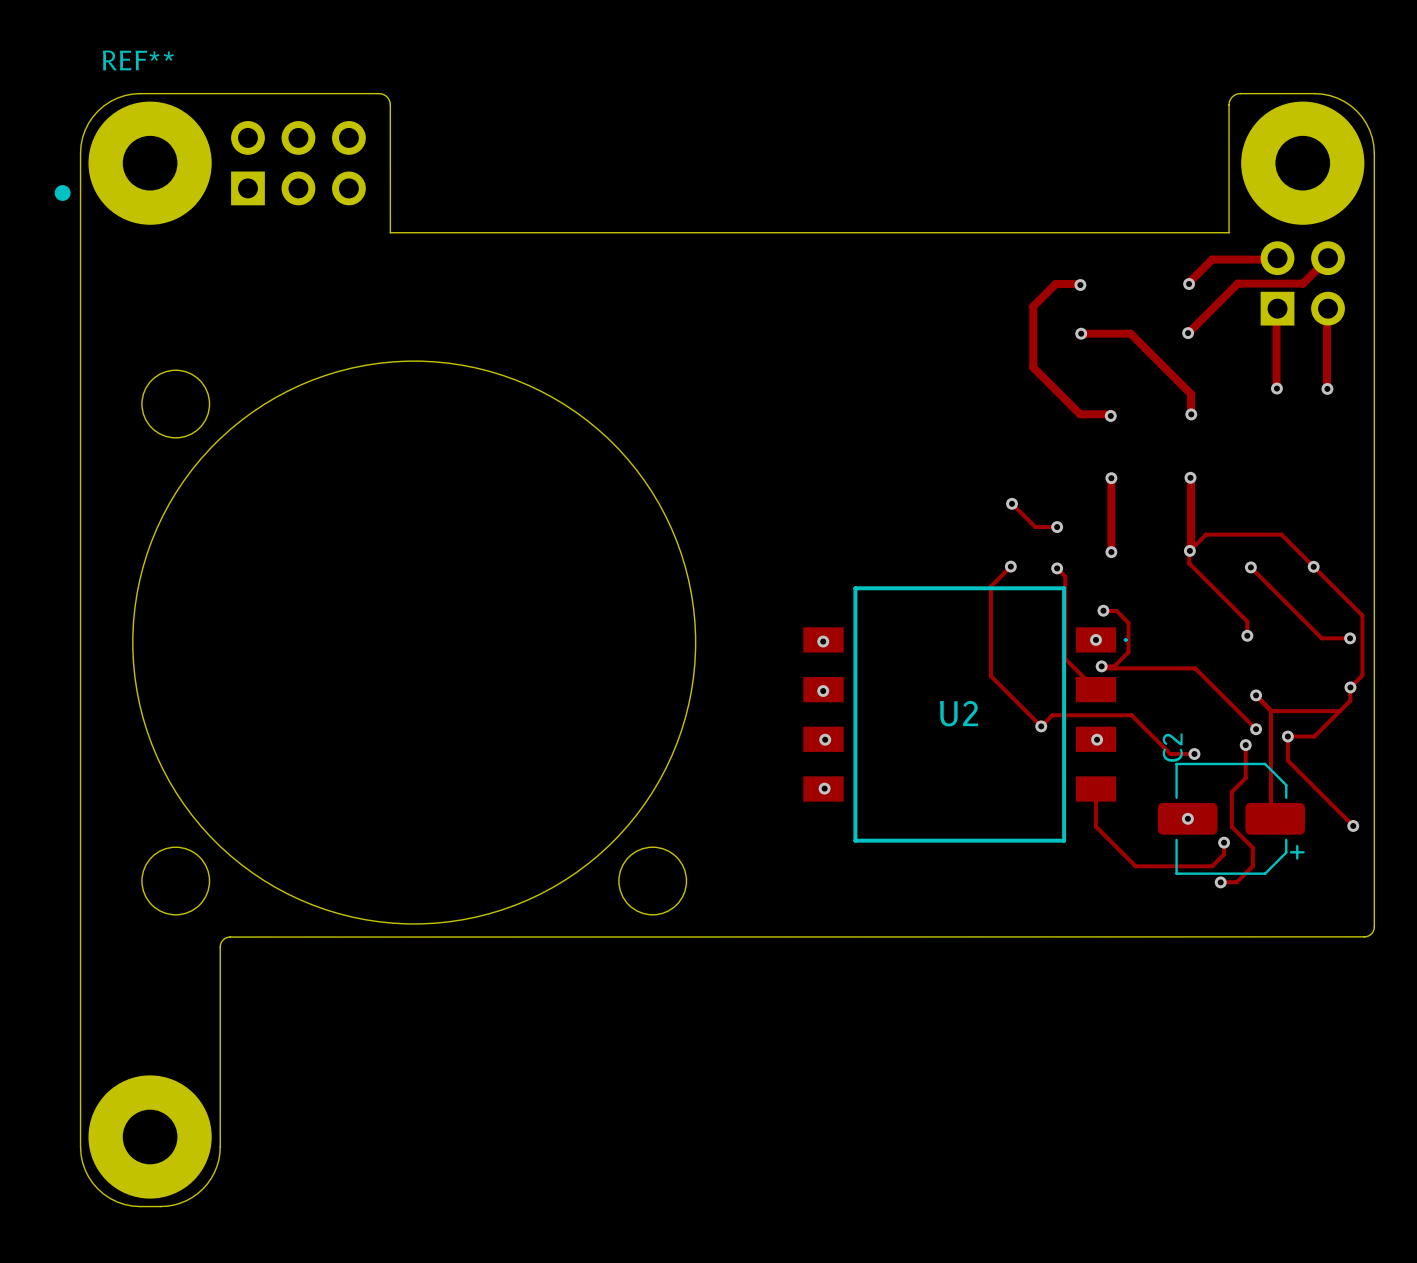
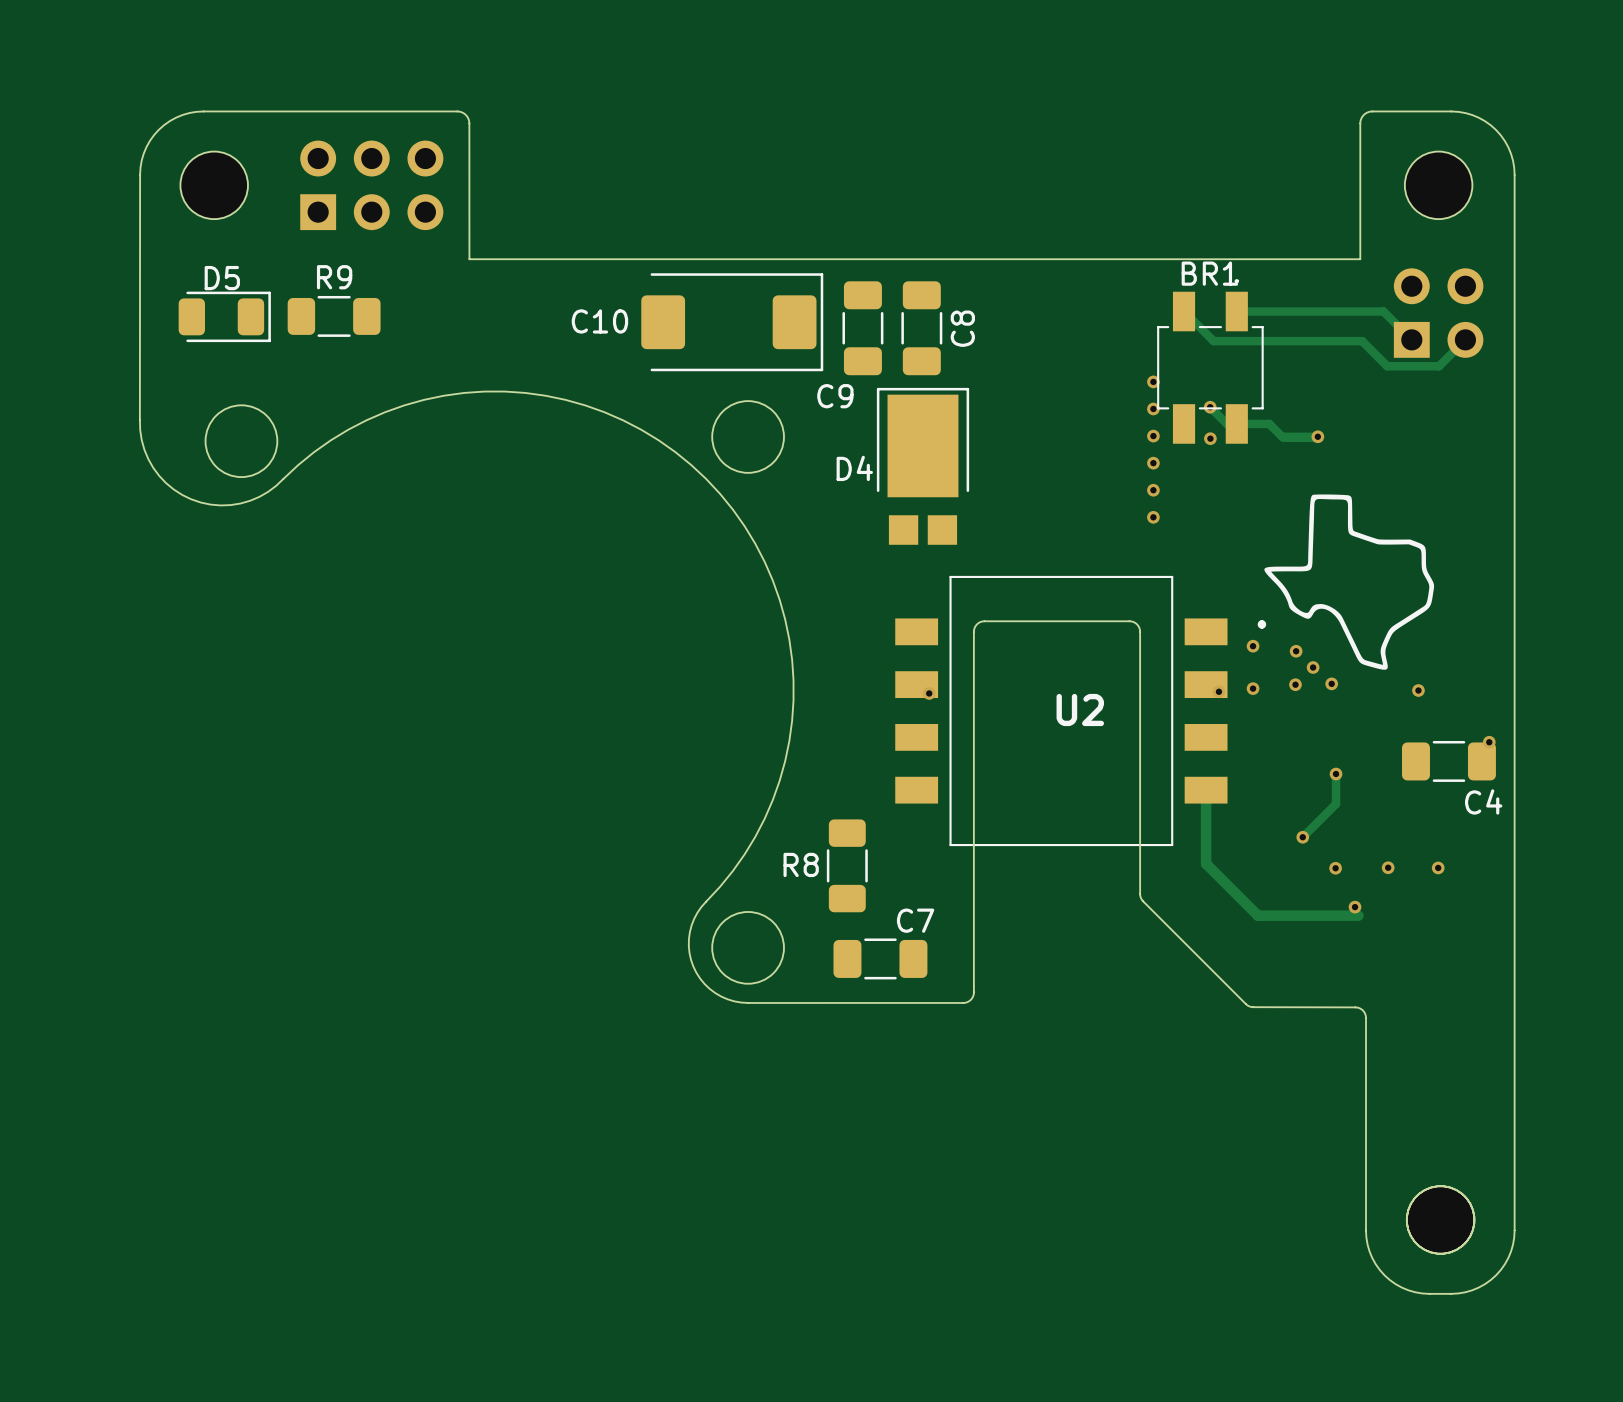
board edge: none -> (203, 111) (182, 114) (164, 125) (149, 141) (141, 160) (139, 420)
part: none -> (214, 185)
part: none -> (1438, 185)
track: (1276, 259) (1212, 259) (1189, 282) -> none
track: (1327, 259) (1302, 283) (1237, 283) (1188, 333) -> none
track: none -> (1184, 311) (1213, 341) (1362, 341) (1387, 366) (1439, 366) (1465, 339)
track: none -> (1236, 311) (1383, 311) (1411, 339)
track: (1079, 284) (1055, 284) (1033, 306) (1033, 367) (1080, 414) (1111, 414) -> none
via: (1189, 284) -> none
via: (1080, 285) -> none
D5: none -> (224, 316)
R9: none -> (334, 316)
C10: none -> (732, 322)
C9: none -> (862, 328)
C8: none -> (921, 328)
track: (1276, 310) (1276, 387) -> none
track: (1327, 310) (1327, 388) -> none
BR1: none -> (1210, 361)
track: (1081, 333) (1130, 333) (1191, 394) (1191, 413) -> none
via: (1081, 333) -> none
via: (1188, 333) -> none
via: none -> (1153, 381)
round board edge: [132, 360, 697, 925] -> none
round board edge: none -> [711, 400, 785, 474]
track: none -> (1210, 407) (1226, 423) (1269, 423) (1282, 436) (1317, 436) (1283, 437)
via: none -> (1210, 407)
via: none -> (1153, 408)
via: (1276, 388) -> none
via: (1327, 388) -> none
via: none -> (1153, 436)
via: none -> (1210, 438)
via position: (1191, 414) -> (1317, 436)
via: (1110, 415) -> none
via: none -> (1153, 463)
D4: none -> (922, 466)
via: none -> (1153, 490)
drawing: none -> [1264, 494, 1435, 670]
via: none -> (1153, 517)
via: (1190, 477) -> none
track: (1111, 478) (1111, 549) -> none
via: (1111, 478) -> none
track: (1191, 478) (1191, 549) -> none
track: (1012, 503) (1035, 527) (1057, 527) -> none
via: (1012, 503) -> none
via: (1057, 527) -> none
track: (1205, 534) (1281, 534) (1362, 615) (1362, 675) (1350, 687) -> none
track: (1205, 534) (1189, 550) -> none
track: (1189, 550) (1189, 563) (1247, 621) (1247, 635) -> none
via: (1189, 550) -> none
via: (1111, 552) -> none
track: (1010, 566) (990, 586) (990, 676) (1041, 726) (1052, 715) (1131, 715) (1170, 754) (1194, 754) -> none
via: (1010, 566) -> none
via: (1313, 566) -> none
track: (1250, 567) (1321, 638) (1350, 638) -> none
via: (1250, 567) -> none
track: (1057, 568) (1065, 576) (1065, 658) (1095, 689) -> none
via: (1057, 568) -> none
U2 footprint: [803, 586, 1128, 843] -> [895, 575, 1267, 847]
via: none -> (1253, 646)
via: none -> (1296, 651)
track: (1103, 610) (1116, 610) (1128, 622) (1128, 652) (1114, 666) (1101, 666) -> none
via: (1103, 610) -> none
via: none -> (1313, 667)
via: none -> (1331, 683)
via: none -> (1295, 684)
via: (1247, 635) -> none
via: none -> (1253, 688)
via: none -> (1418, 690)
via: (1350, 638) -> none
REF**: (714, 650) -> none
track: (1101, 666) (1103, 668) (1195, 668) (1256, 729) -> none
via: (1101, 666) -> none
track: (1350, 687) (1350, 700) (1314, 736) (1287, 736) (1287, 760) (1353, 825) -> none
via: (823, 691) -> none
track: (1256, 695) (1270, 710) (1270, 813) -> none
via: (1256, 695) -> none
track: (1257, 697) (1270, 711) (1339, 711) -> none
C4: none -> (1448, 761)
track: none -> (1336, 774) (1336, 803) (1302, 837)
via: none -> (1336, 774)
via: (1041, 726) -> none
via: (1256, 729) -> none
track: none -> (1206, 790) (1206, 863) (1258, 915) (1358, 915)
via: (1287, 736) -> none
via: (825, 739) -> none
via: (1097, 739) -> none
track: (1245, 745) (1245, 778) (1231, 791) (1231, 826) (1252, 847) (1252, 866) (1236, 882) (1220, 882) -> none
via: (1245, 745) -> none
via: (1194, 754) -> none
via: none -> (1302, 837)
via: (824, 788) -> none
track: (1095, 789) (1095, 826) (1135, 866) (1212, 866) (1224, 854) (1224, 842) -> none
R8: none -> (847, 865)
via: none -> (1388, 867)
via: none -> (1438, 867)
via: none -> (1335, 868)
via: (1187, 818) -> none
C2: (1231, 818) -> none
via: (1353, 825) -> none
round board edge: [141, 846, 211, 916] -> none
via: (1220, 882) -> none
C7: none -> (880, 958)
board edge: (1374, 926) (1371, 933) (1364, 936) (227, 937) (222, 940) (220, 947) (220, 1146) (216, 1166) (207, 1184) (197, 1193) (186, 1200) (167, 1206) (140, 1206) -> (1514, 996) (1514, 1230) (1511, 1251) (1504, 1264) (1496, 1275) (1485, 1284) (1472, 1290) (1451, 1293) (1422, 1293) (1408, 1290) (1395, 1284) (1379, 1270) (1369, 1251) (1366, 1237) (1366, 1017) (1363, 1011) (1355, 1007) (1248, 1005) (1140, 897) (1140, 631) (1135, 622) (1129, 621) (984, 621) (978, 623) (974, 627) (973, 992) (970, 999) (963, 1002) (748, 1002) (734, 1001) (715, 993) (704, 984) (696, 972) (689, 952) (689, 932) (694, 918) (701, 906) (720, 886) (744, 854) (772, 799) (789, 741) (793, 680) (785, 619) (772, 580) (744, 526) (706, 478) (658, 440) (604, 412) (545, 395) (484, 391) (424, 399) (385, 412) (330, 440) (298, 464) (276, 485) (259, 496) (230, 505) (210, 504) (182, 494) (159, 475) (144, 449) (139, 420)
part: none -> (1440, 1219)

